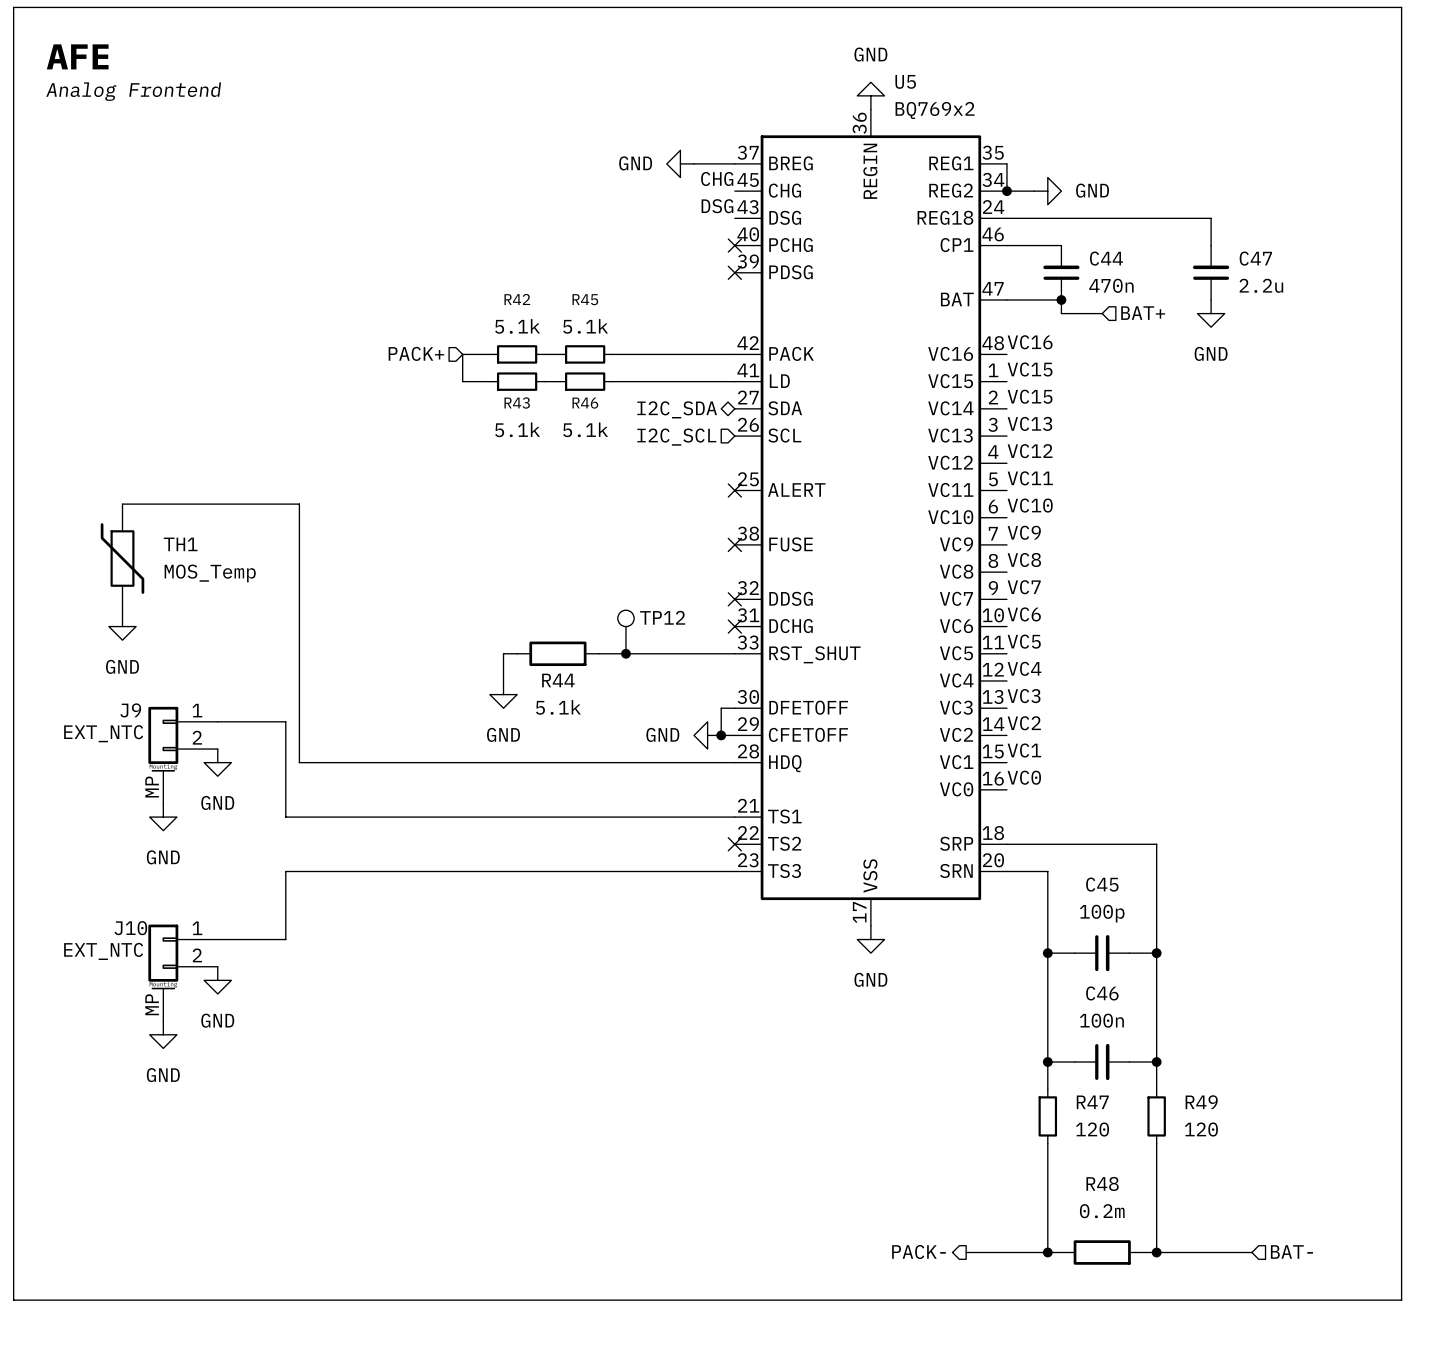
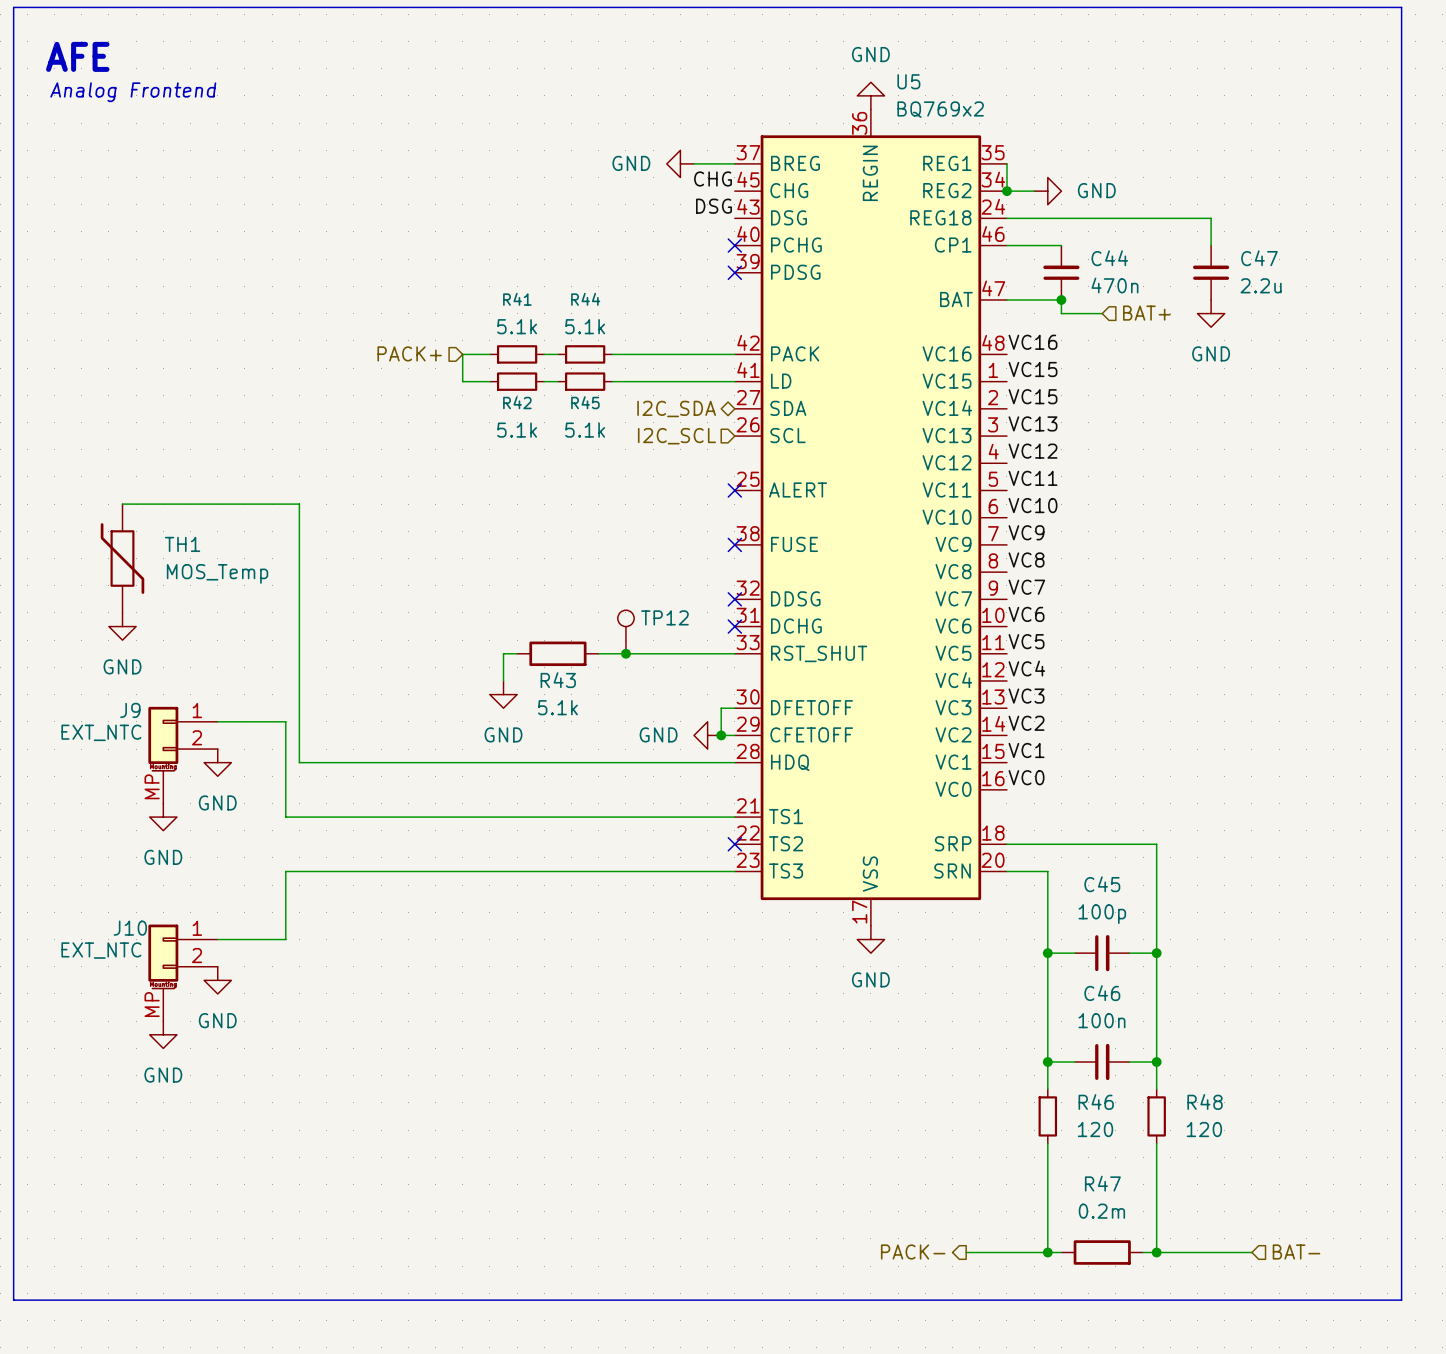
R42 name: R42 (517, 299) -> R41 (517, 299)
R45 name: R45 (585, 299) -> R44 (585, 299)
R43 name: R43 (517, 403) -> R42 (517, 402)
R46 name: R46 (585, 403) -> R45 (585, 402)
R44 name: R44 (558, 680) -> R43 (558, 680)
R47 name: R47 (1092, 1102) -> R46 (1096, 1101)
R49 name: R49 (1201, 1102) -> R48 (1205, 1101)
R48 name: R48 (1102, 1183) -> R47 (1102, 1183)

